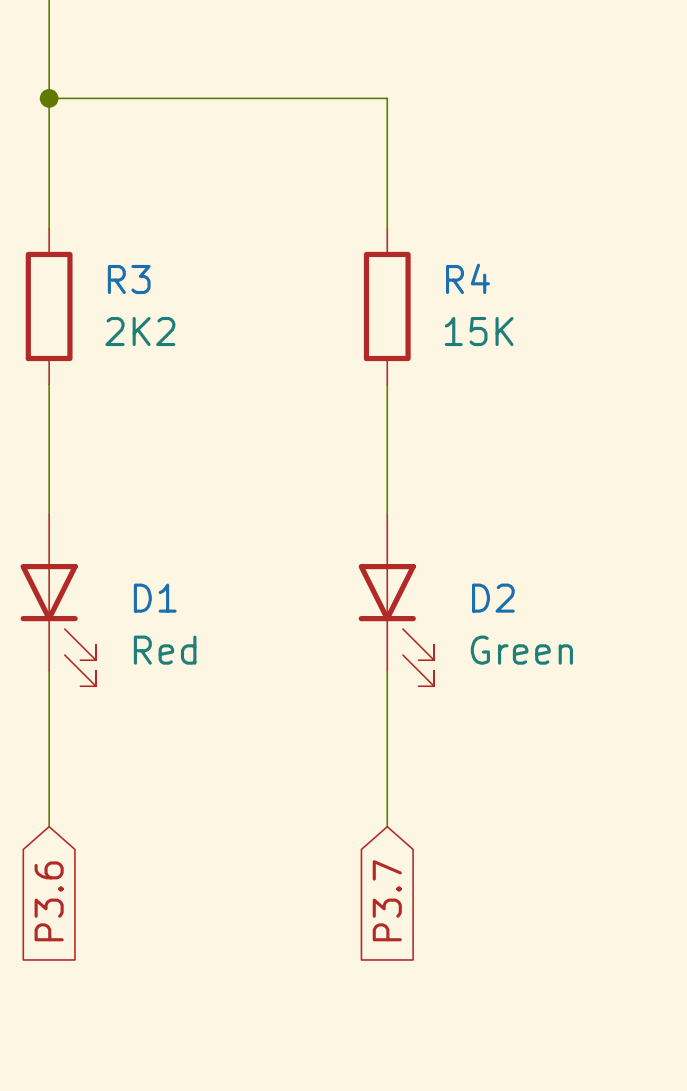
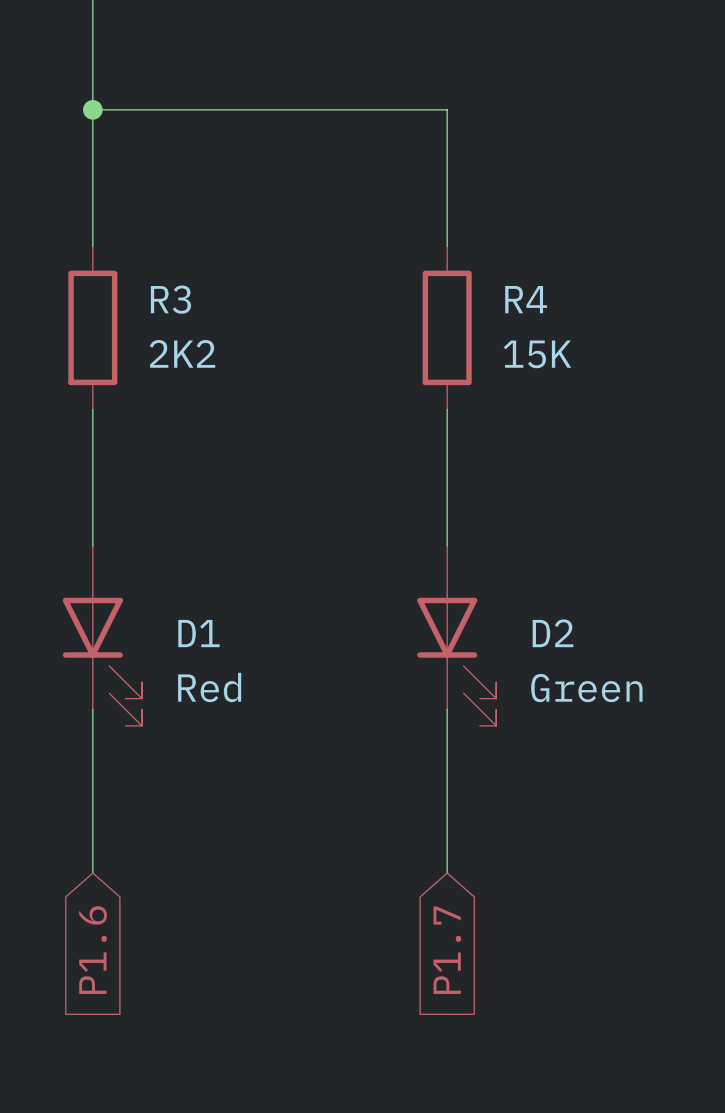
global label: P3.7 (387, 900) -> P1.7 (447, 950)
global label: P3.6 (49, 901) -> P1.6 (93, 950)

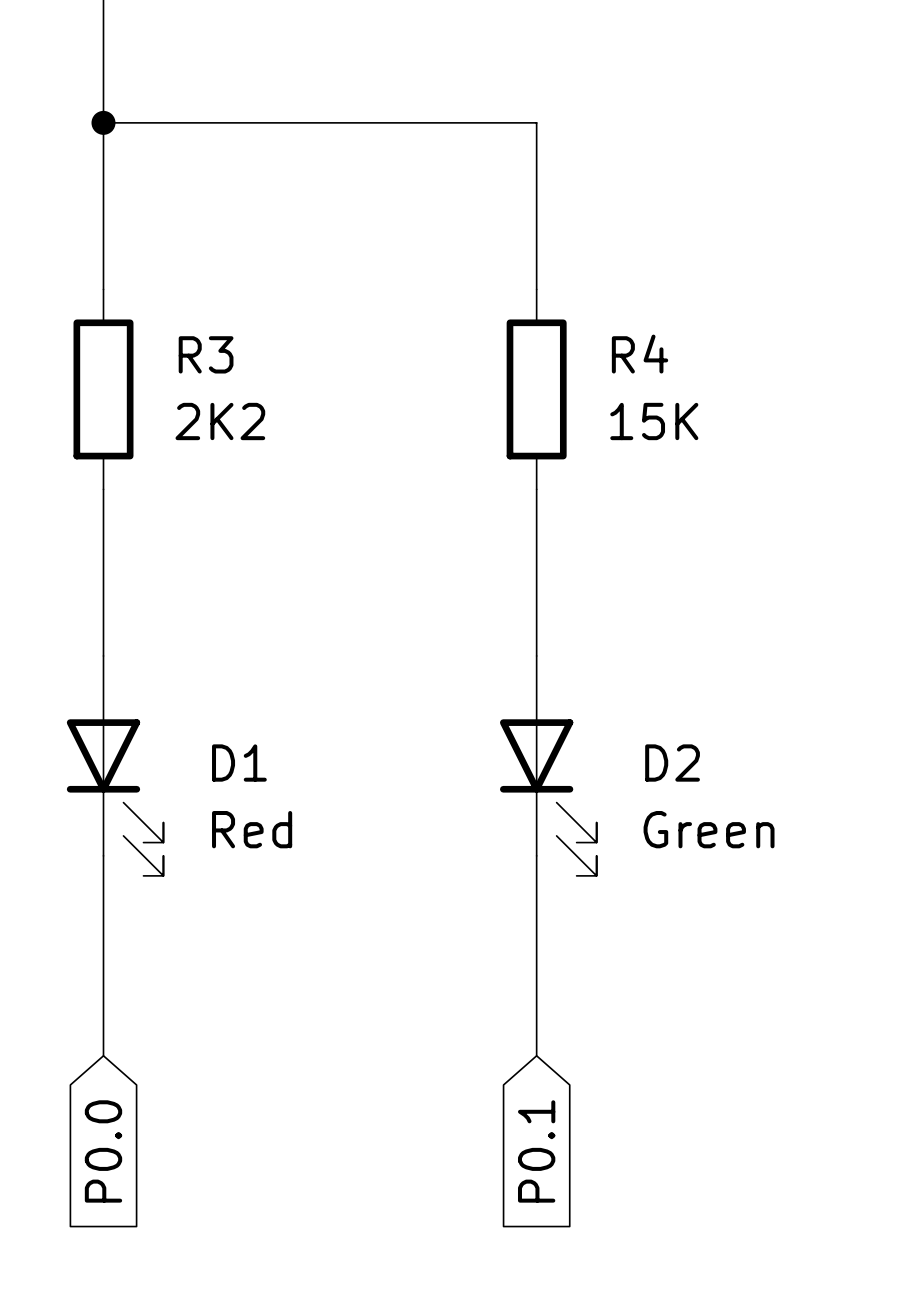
global label: P1.6 (93, 950) -> P0.0 (103, 1151)
global label: P1.7 (447, 950) -> P0.1 (536, 1151)

